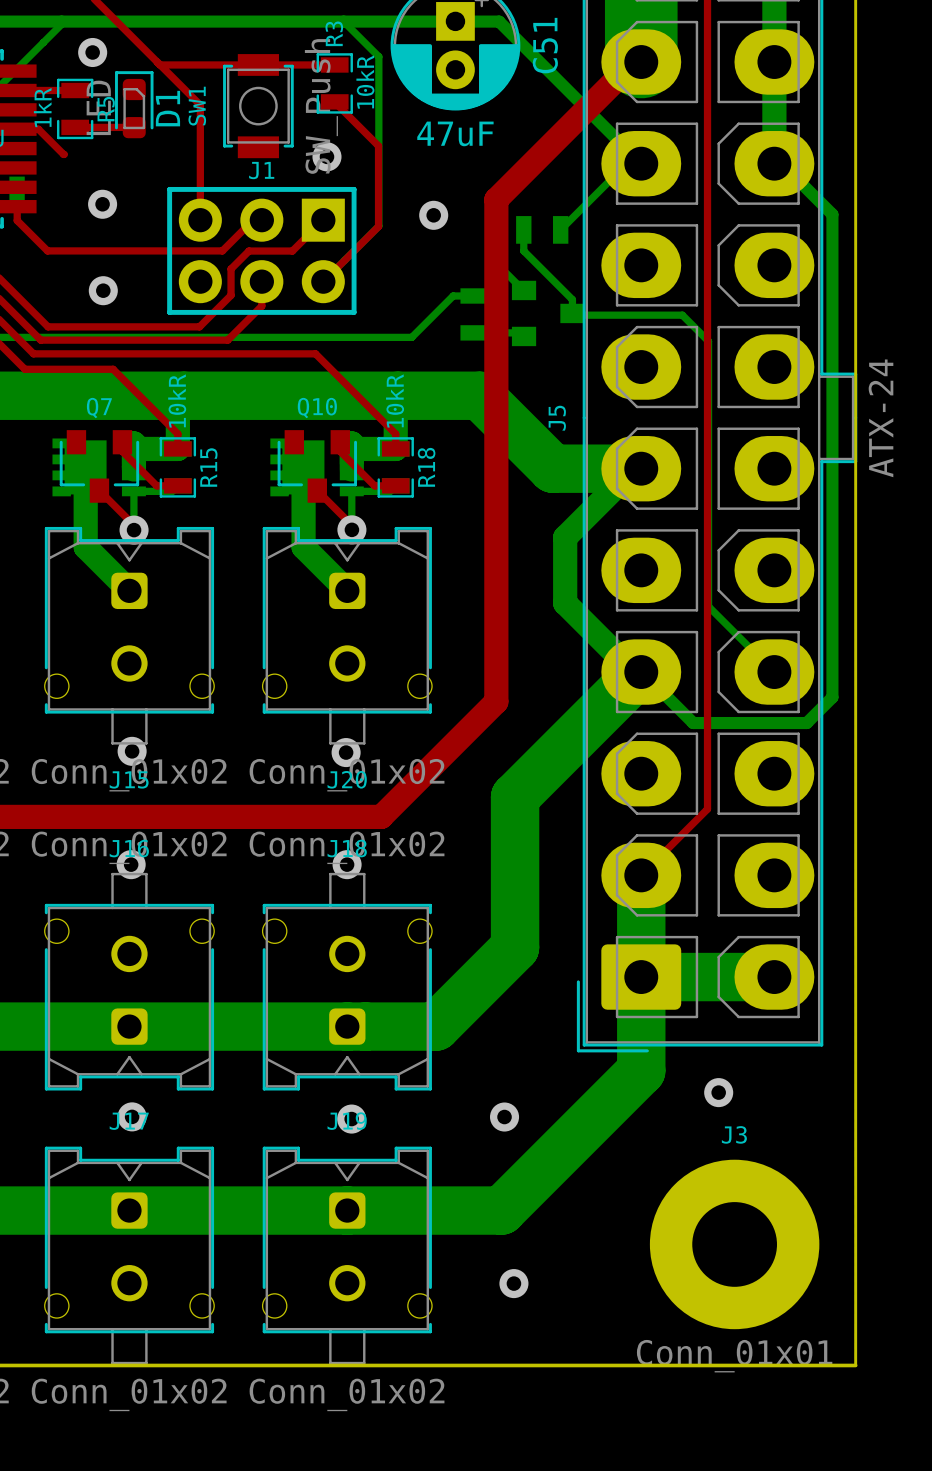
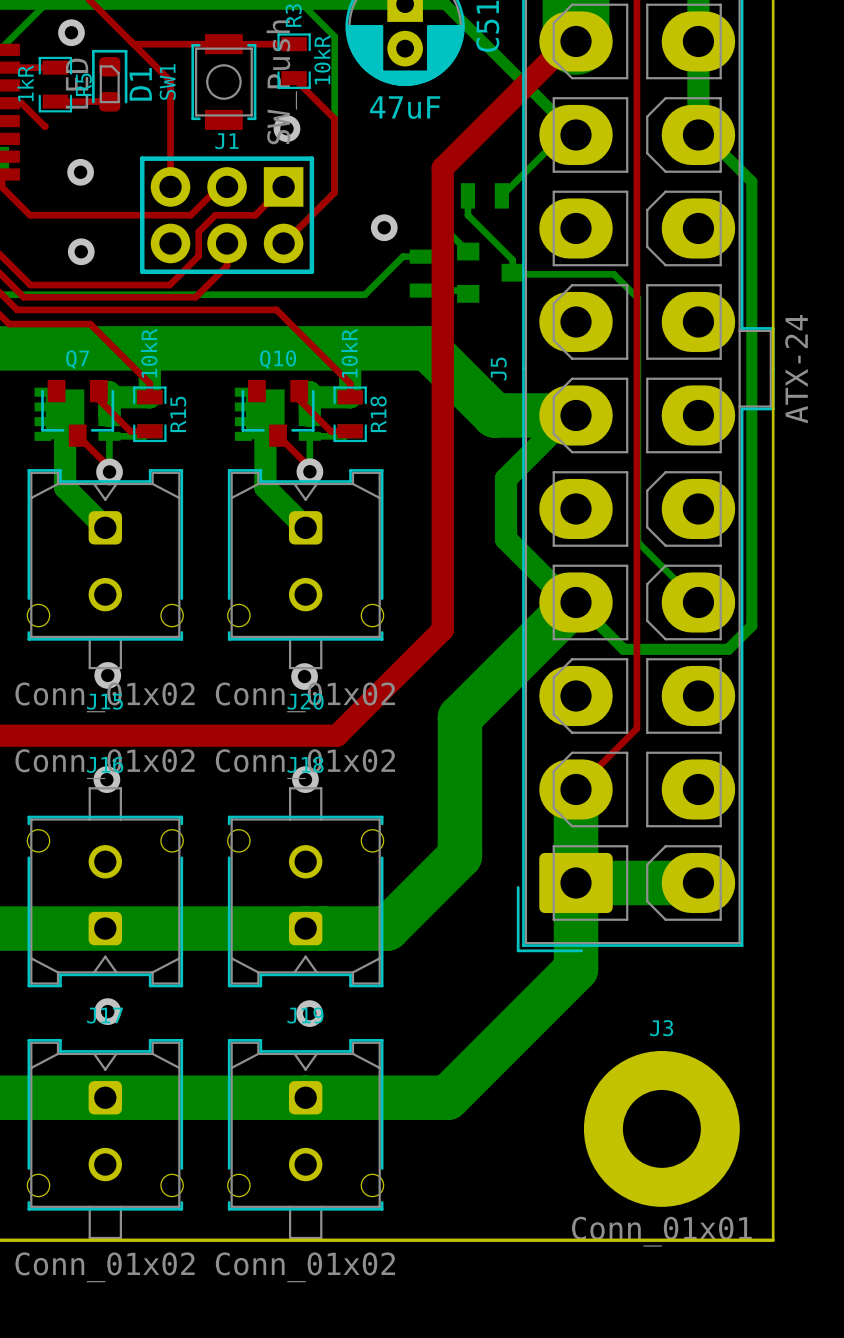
via position: (433, 215) -> (384, 227)
via: (718, 1092) -> none
via: (504, 1117) -> none
via: (513, 1283) -> none

